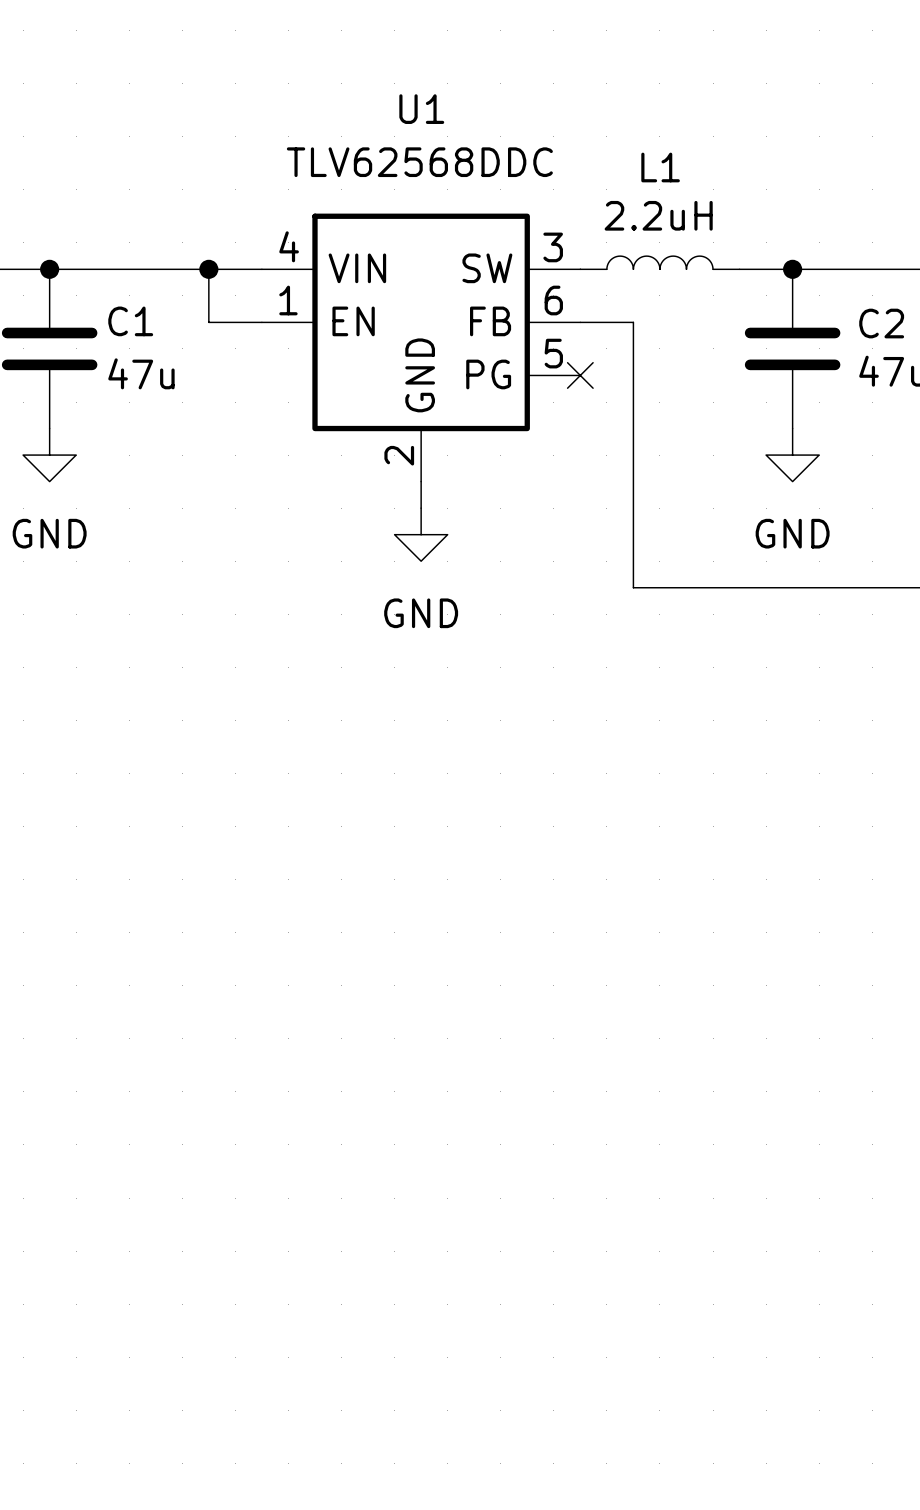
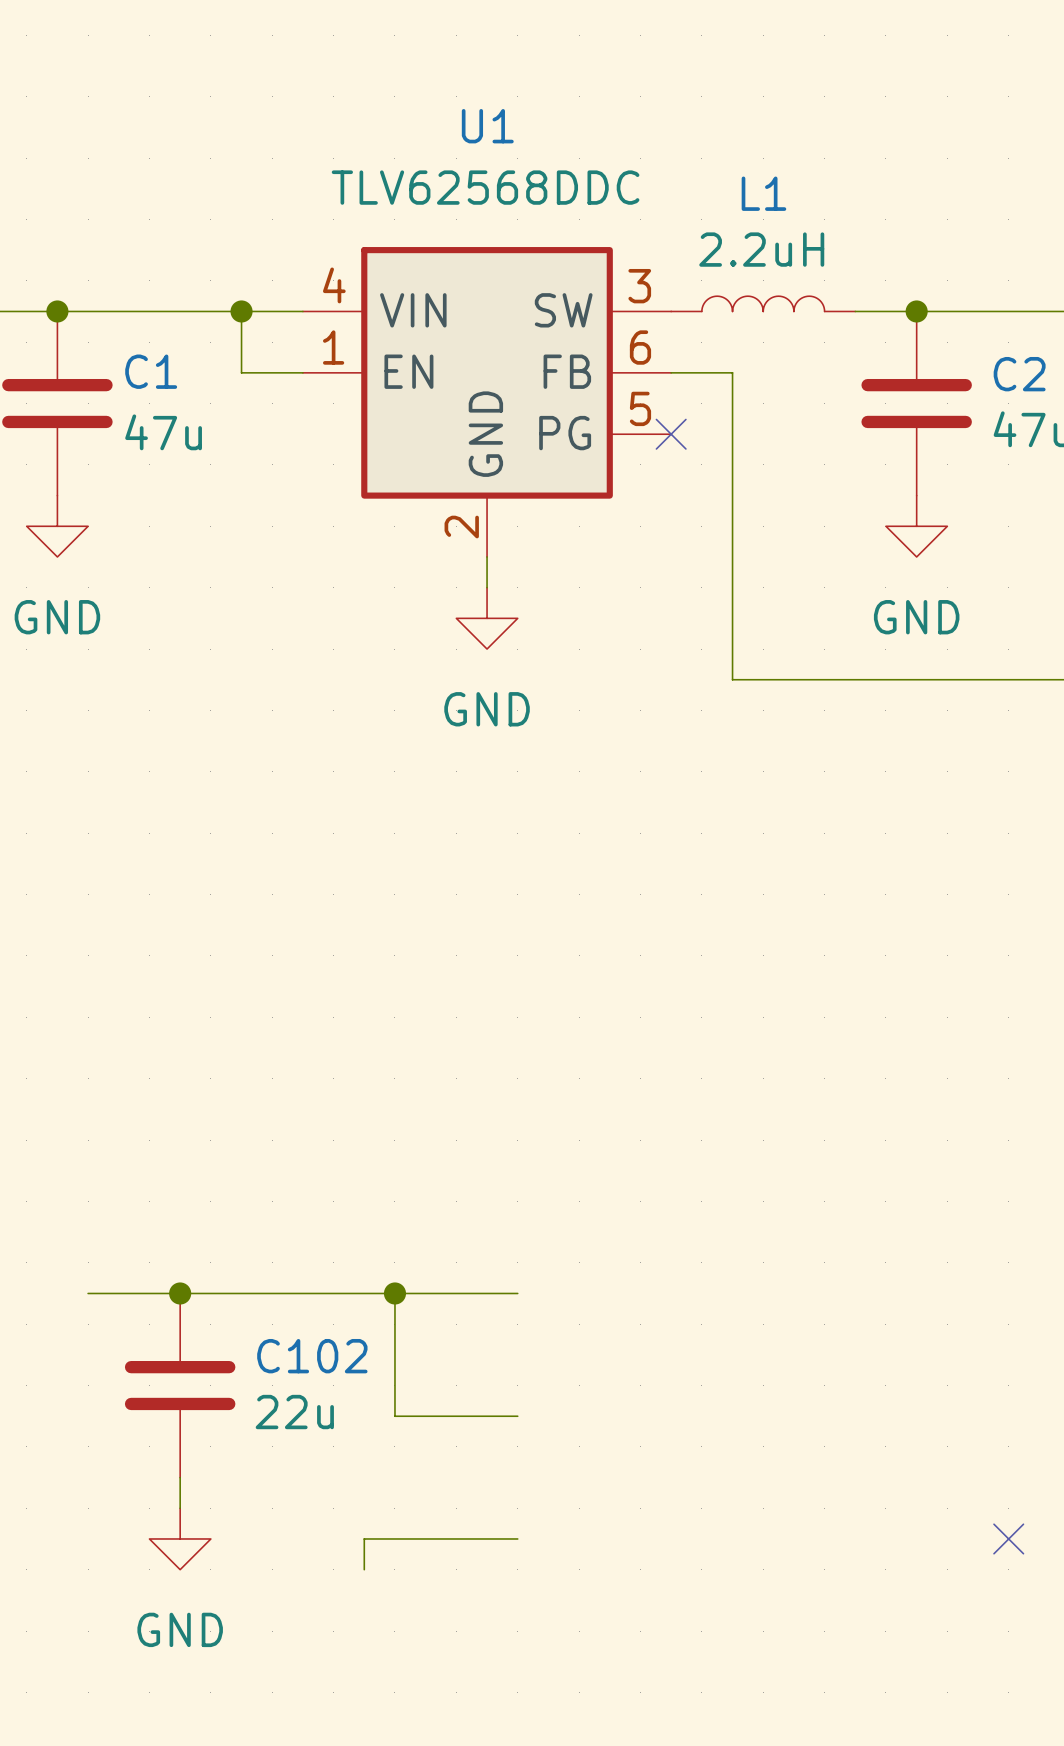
wire: none -> (88, 1293) (517, 1293)
junction: none -> (180, 1293)
wire: none -> (394, 1293) (394, 1416) (517, 1416)
junction: none -> (394, 1293)
C102: none -> 22u (180, 1385)
wire: none -> (180, 1477) (180, 1508)
power symbol: none -> GND (180, 1538)
wire: none -> (517, 1538) (364, 1538) (364, 1569)
no-connect mark: none -> (1008, 1538)

